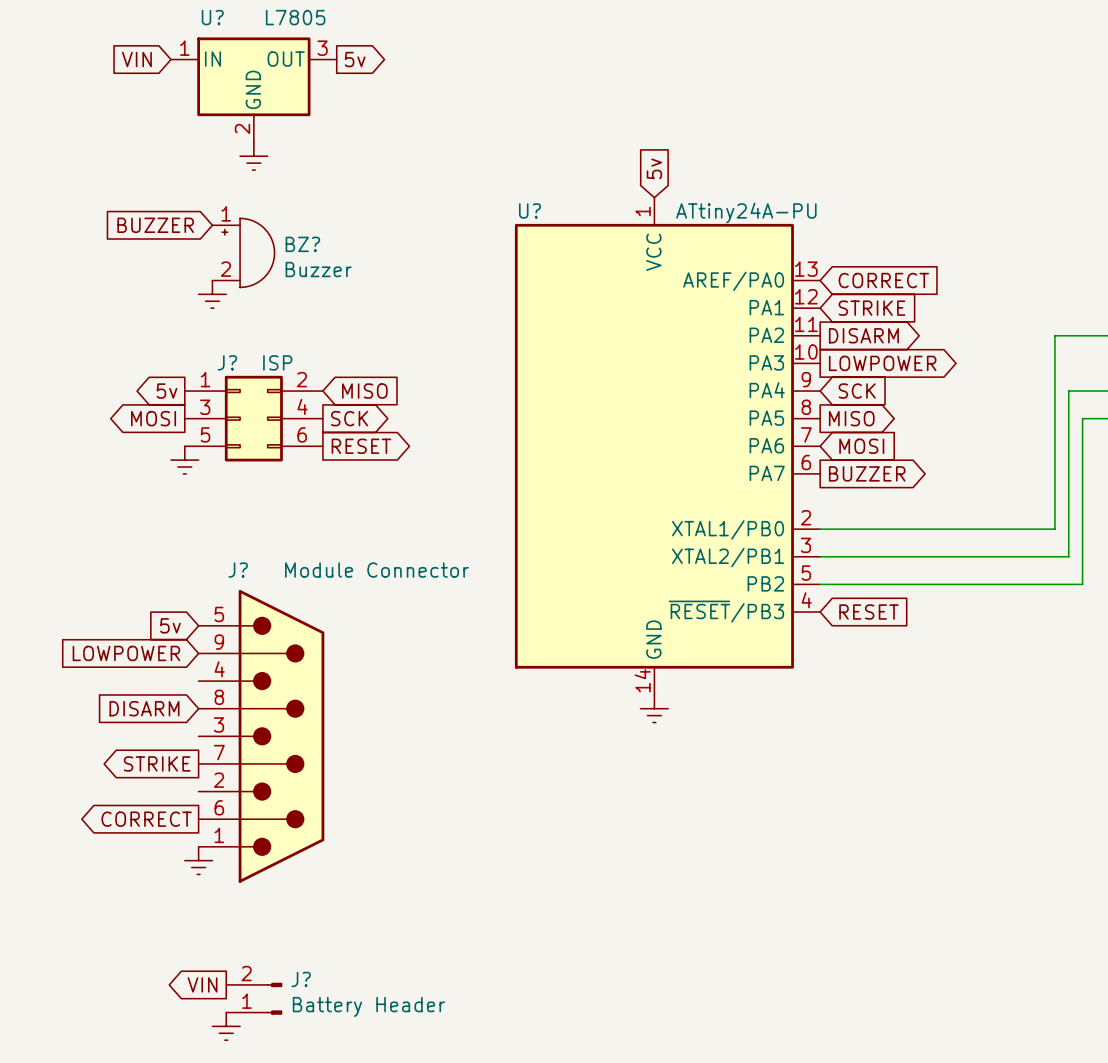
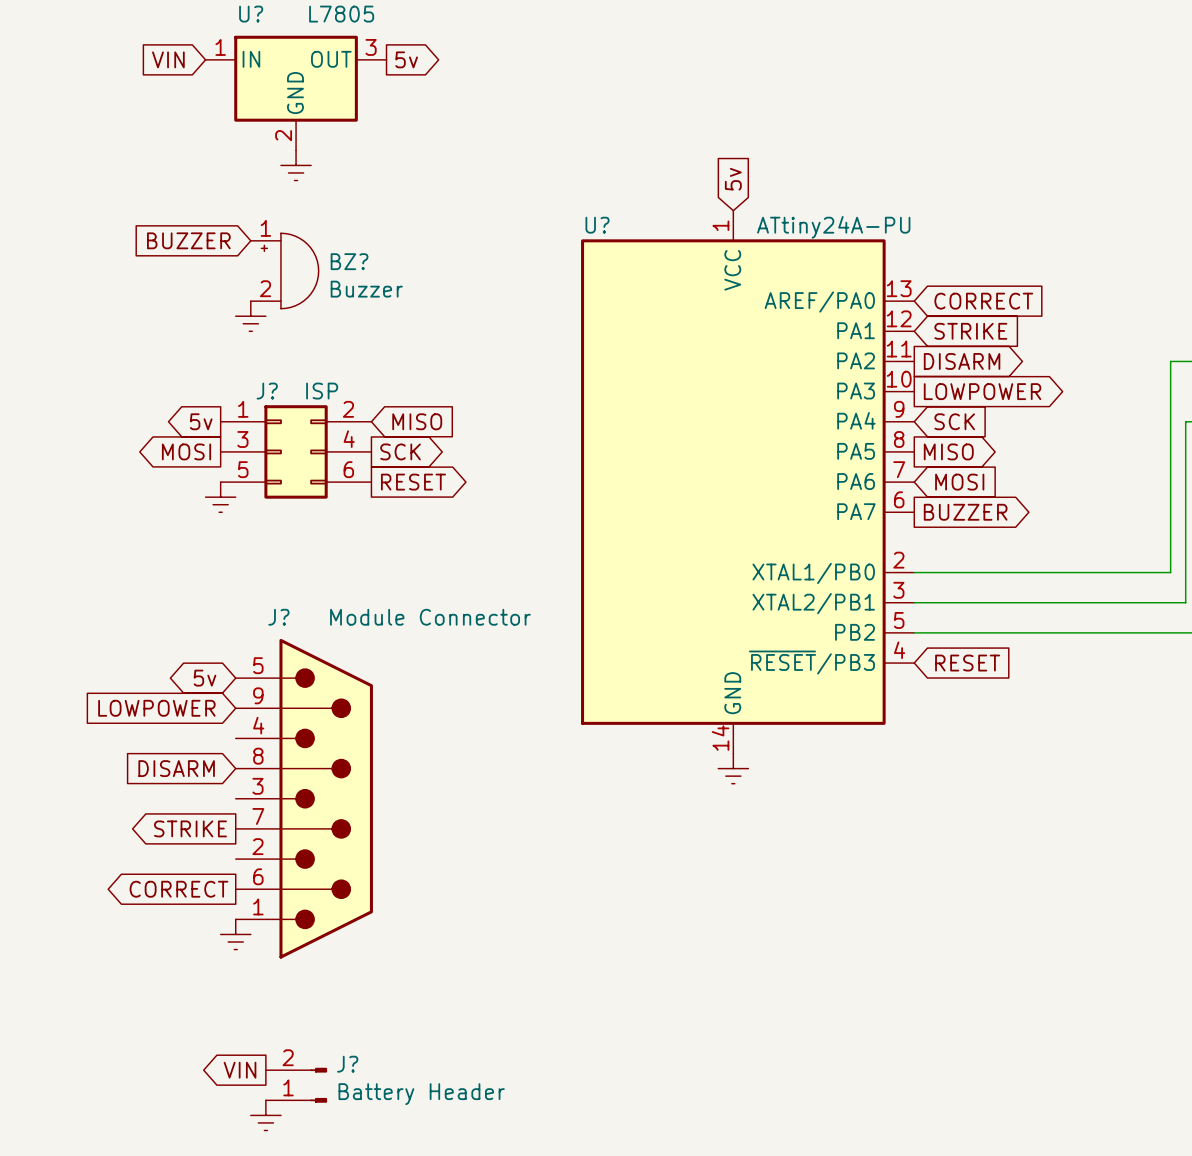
global label shape: input (170, 625) -> bidirectional (205, 678)

